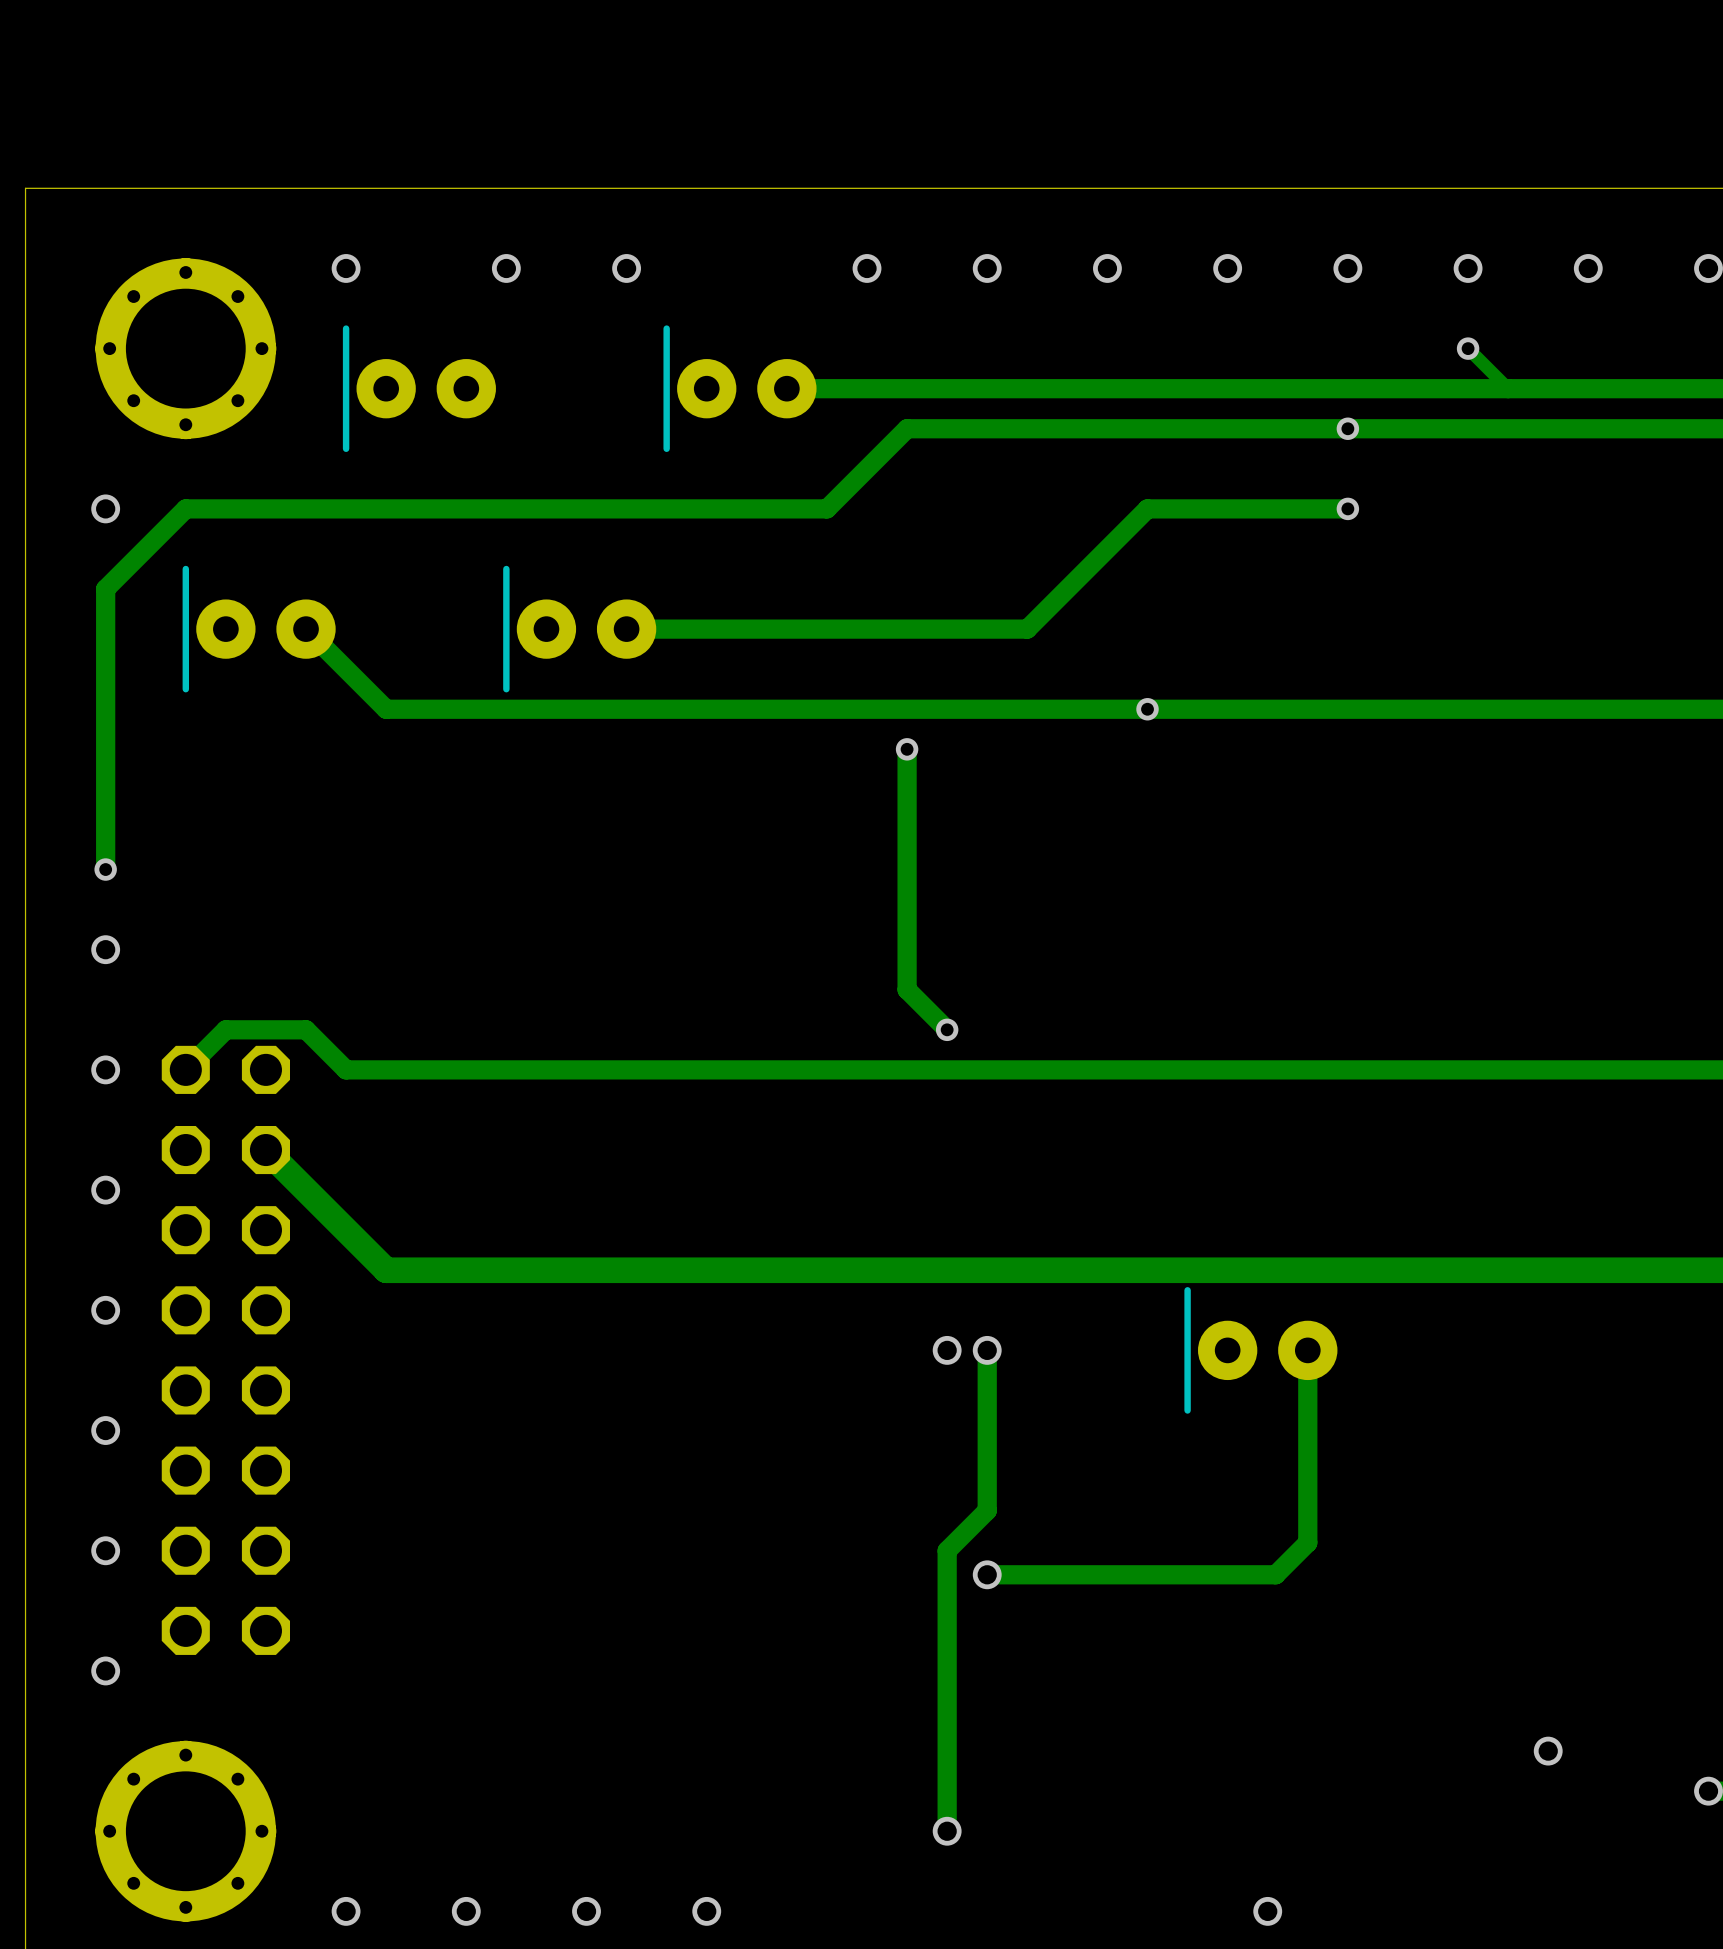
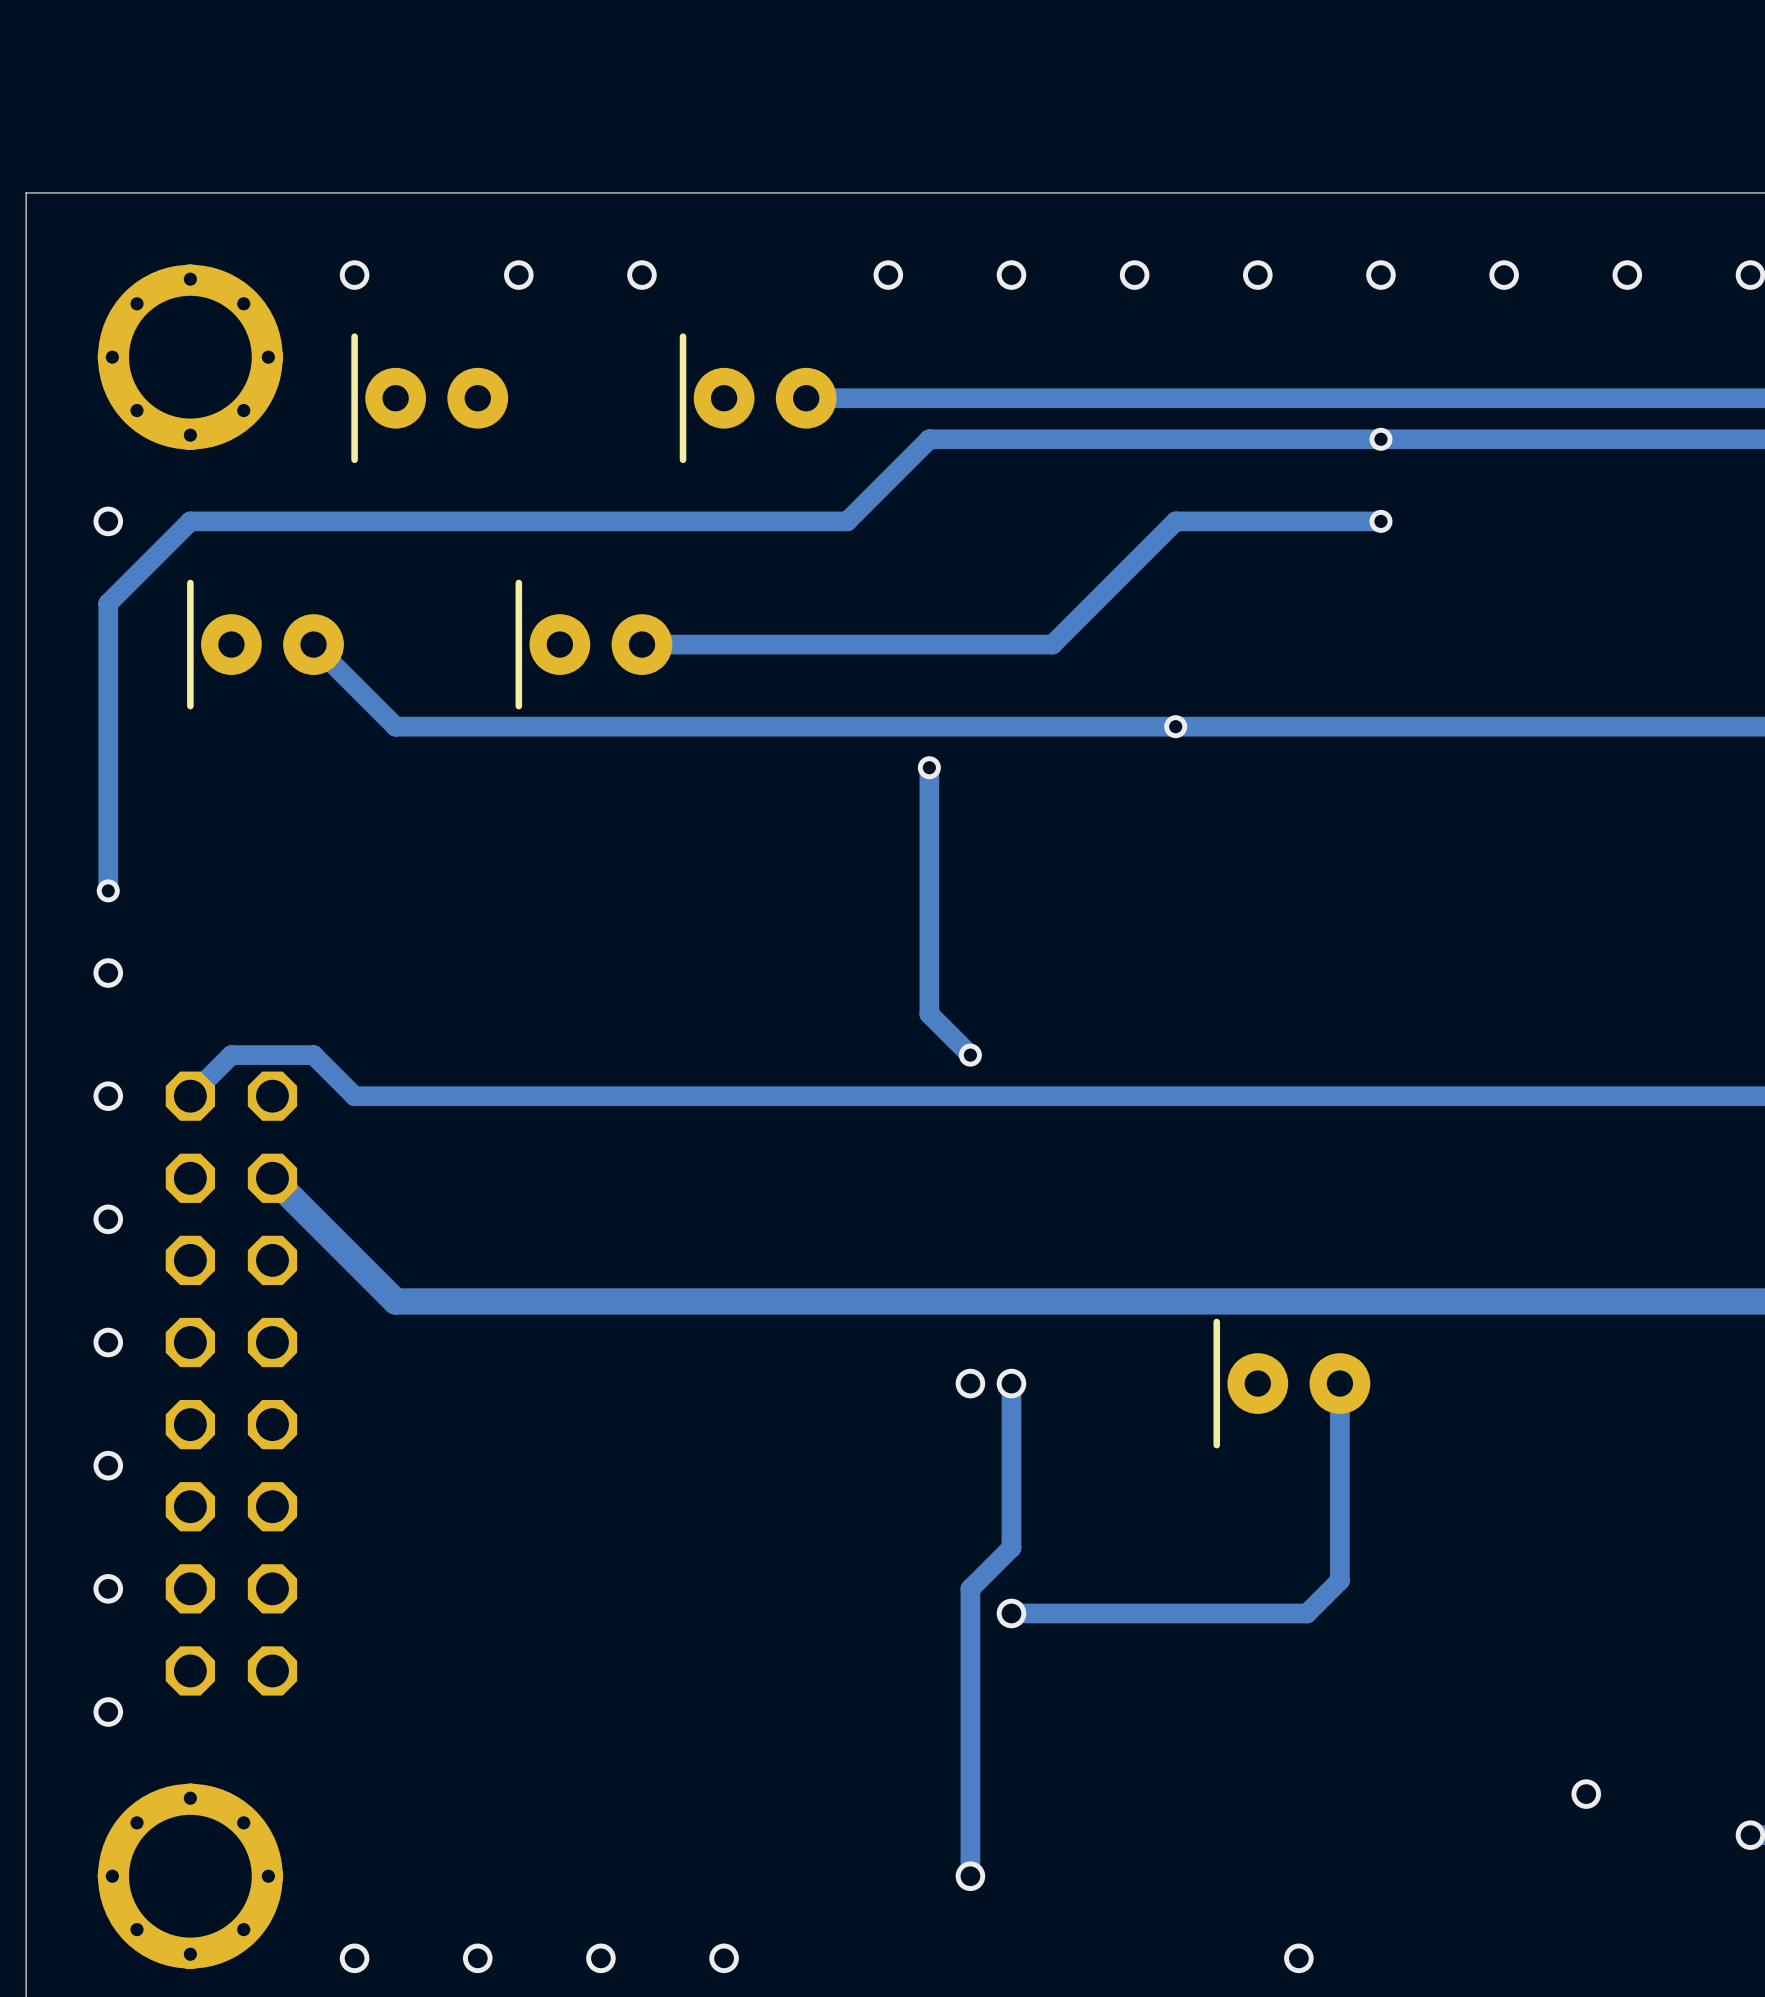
track: (1468, 348) (1508, 388) -> none
via: (1468, 348) -> none

